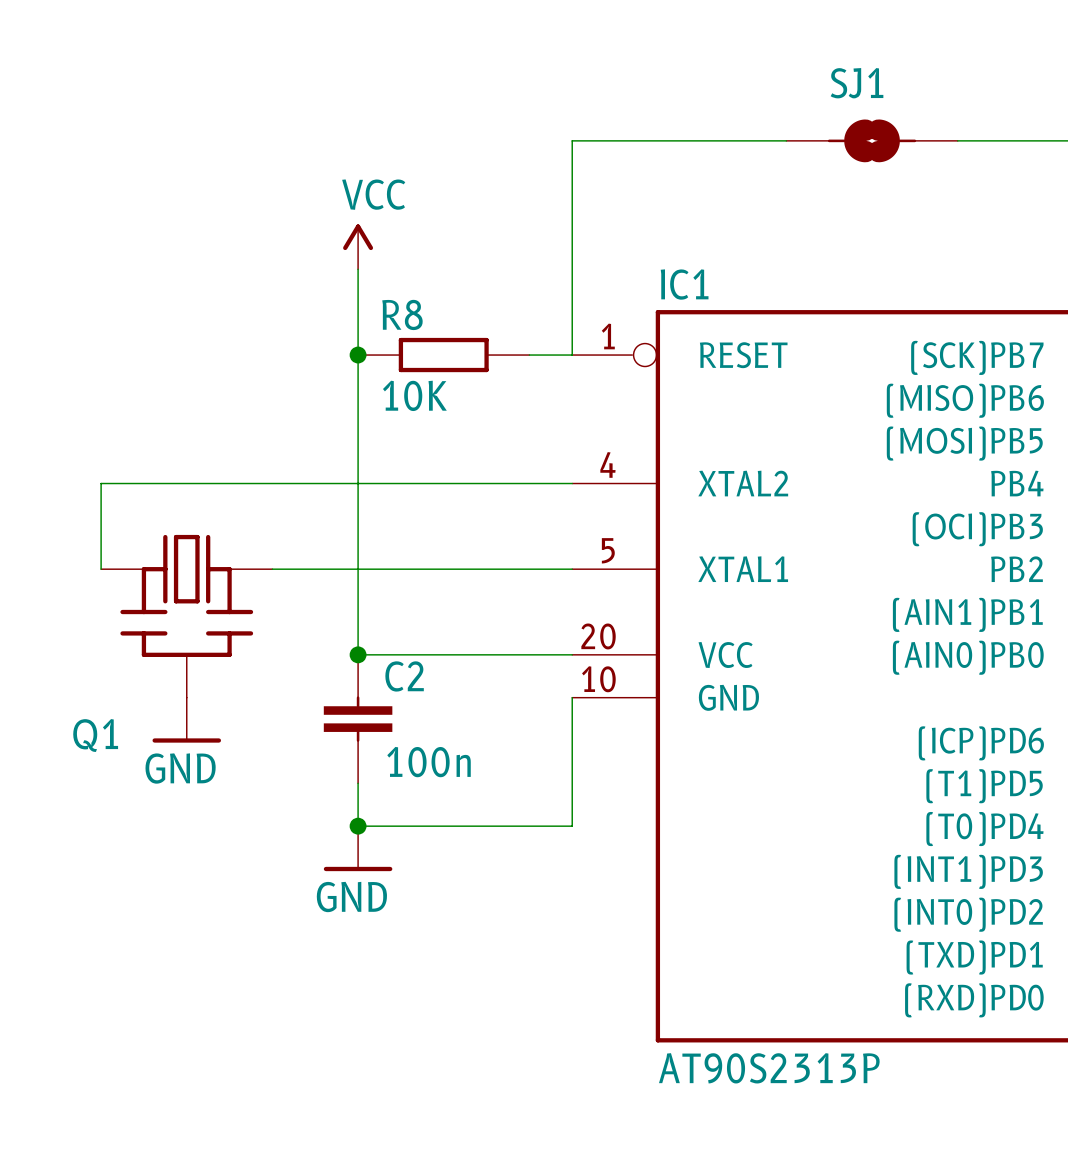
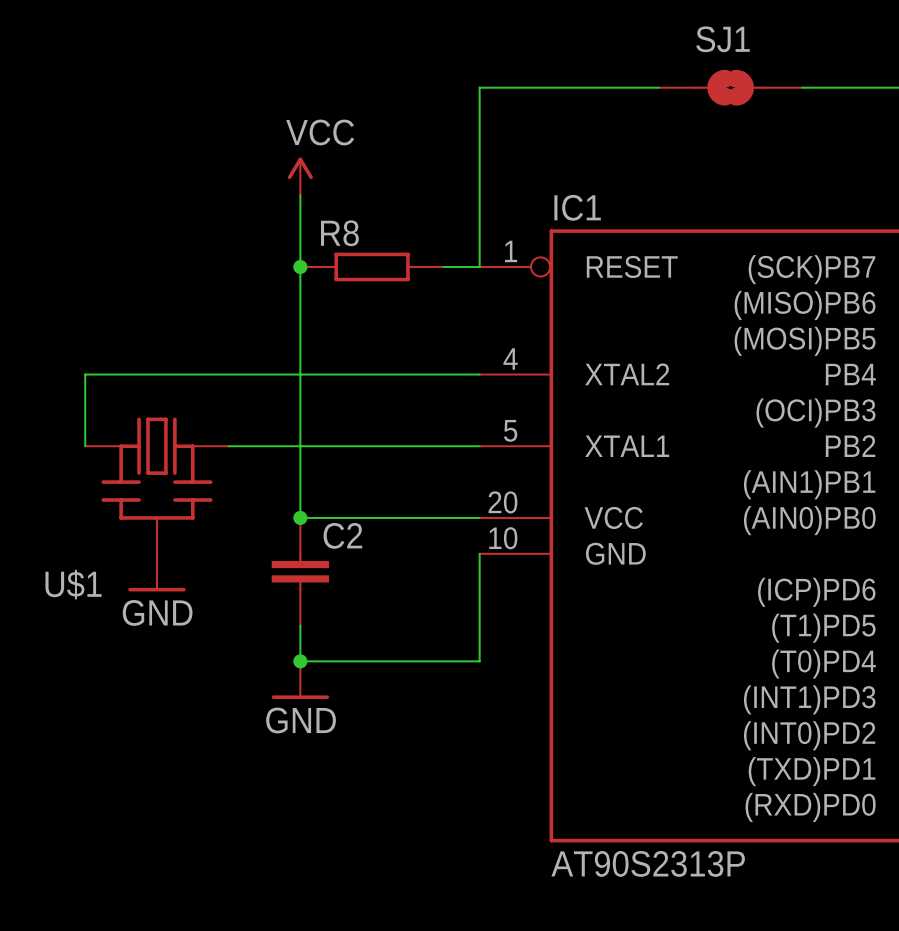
R8 value: 10K (414, 395) -> none
Q1 name: Q1 (95, 735) -> U$1 (73, 584)
C2 value: 100n (429, 762) -> none

